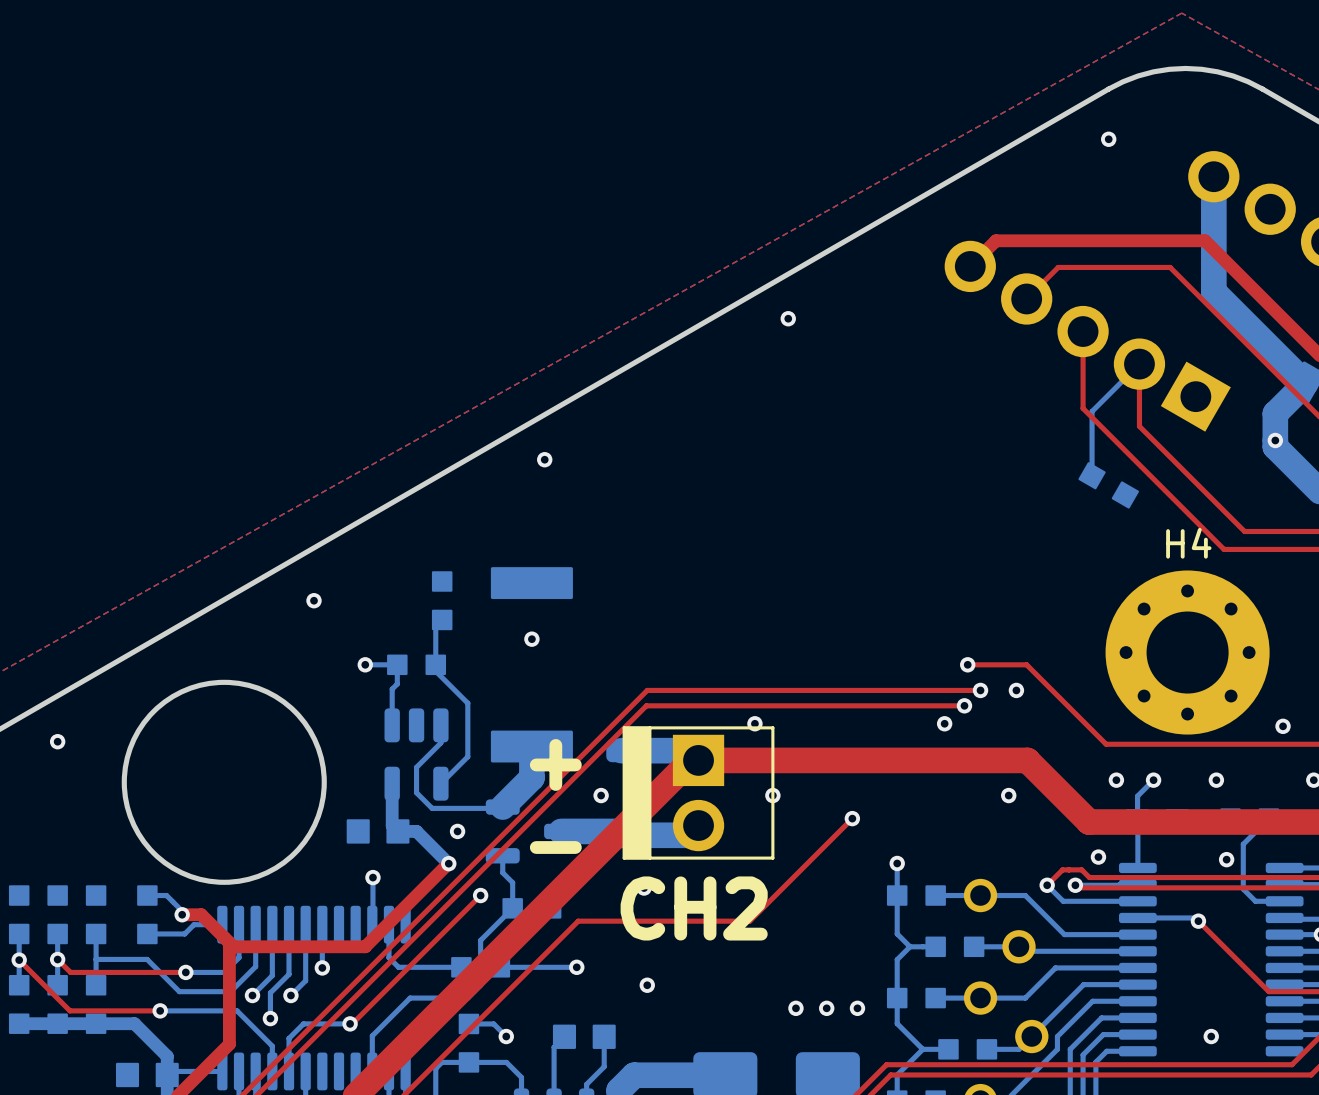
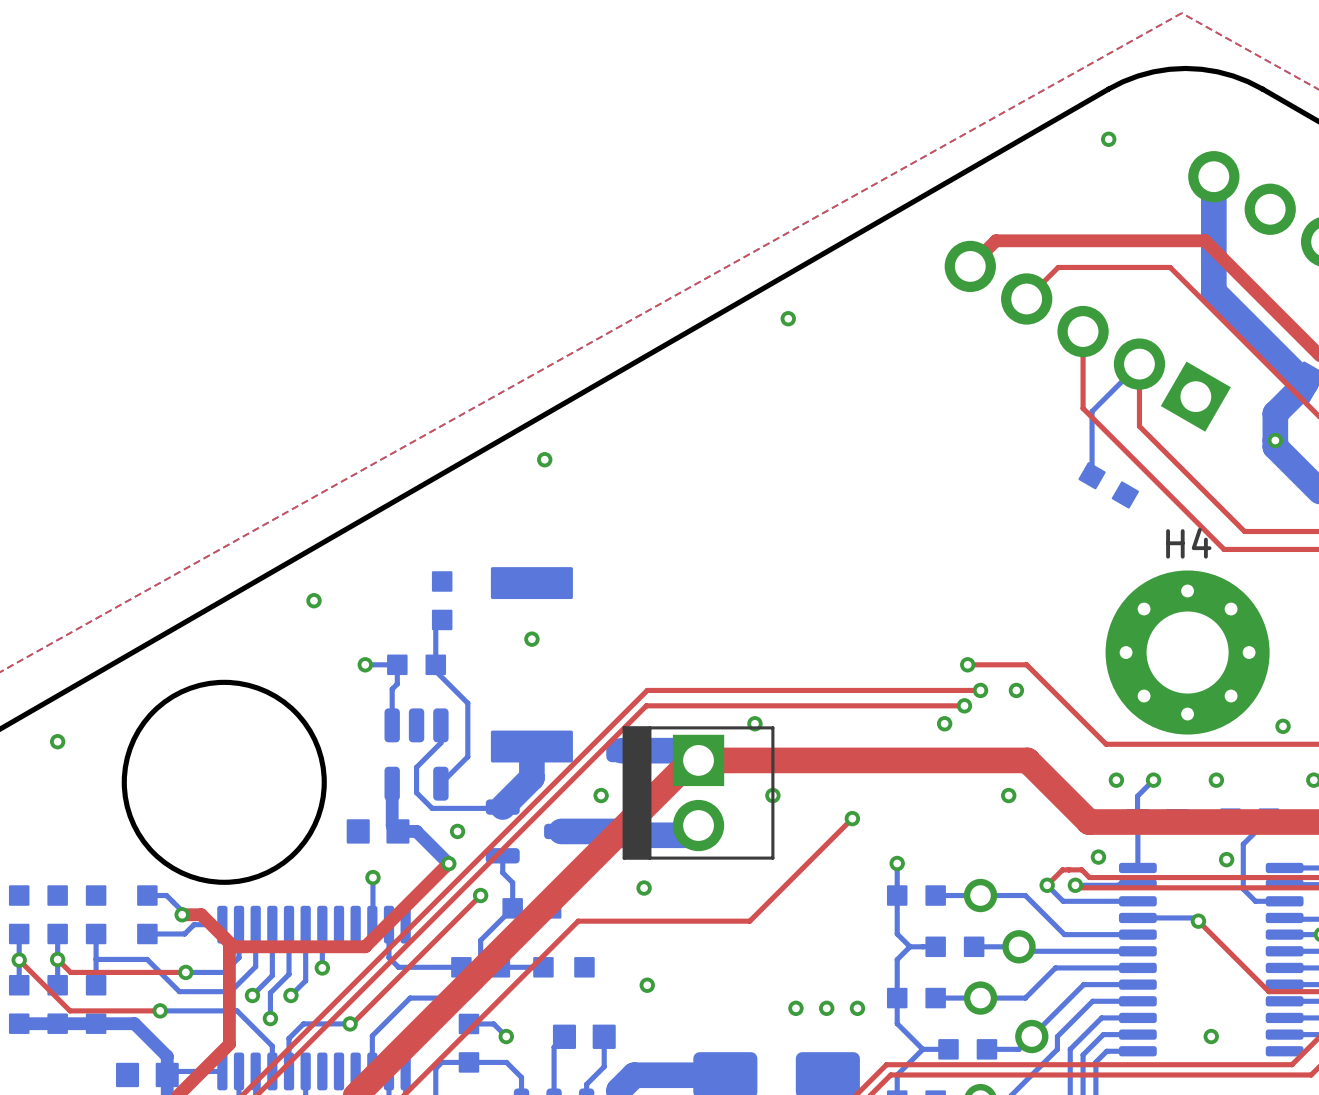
text: + (555, 764) -> none
text: - (555, 847) -> none
text: CH2 (694, 908) -> none
bottom track: (543, 967) (576, 967) -> none
part: none -> (563, 967)
via: (576, 967) -> none

